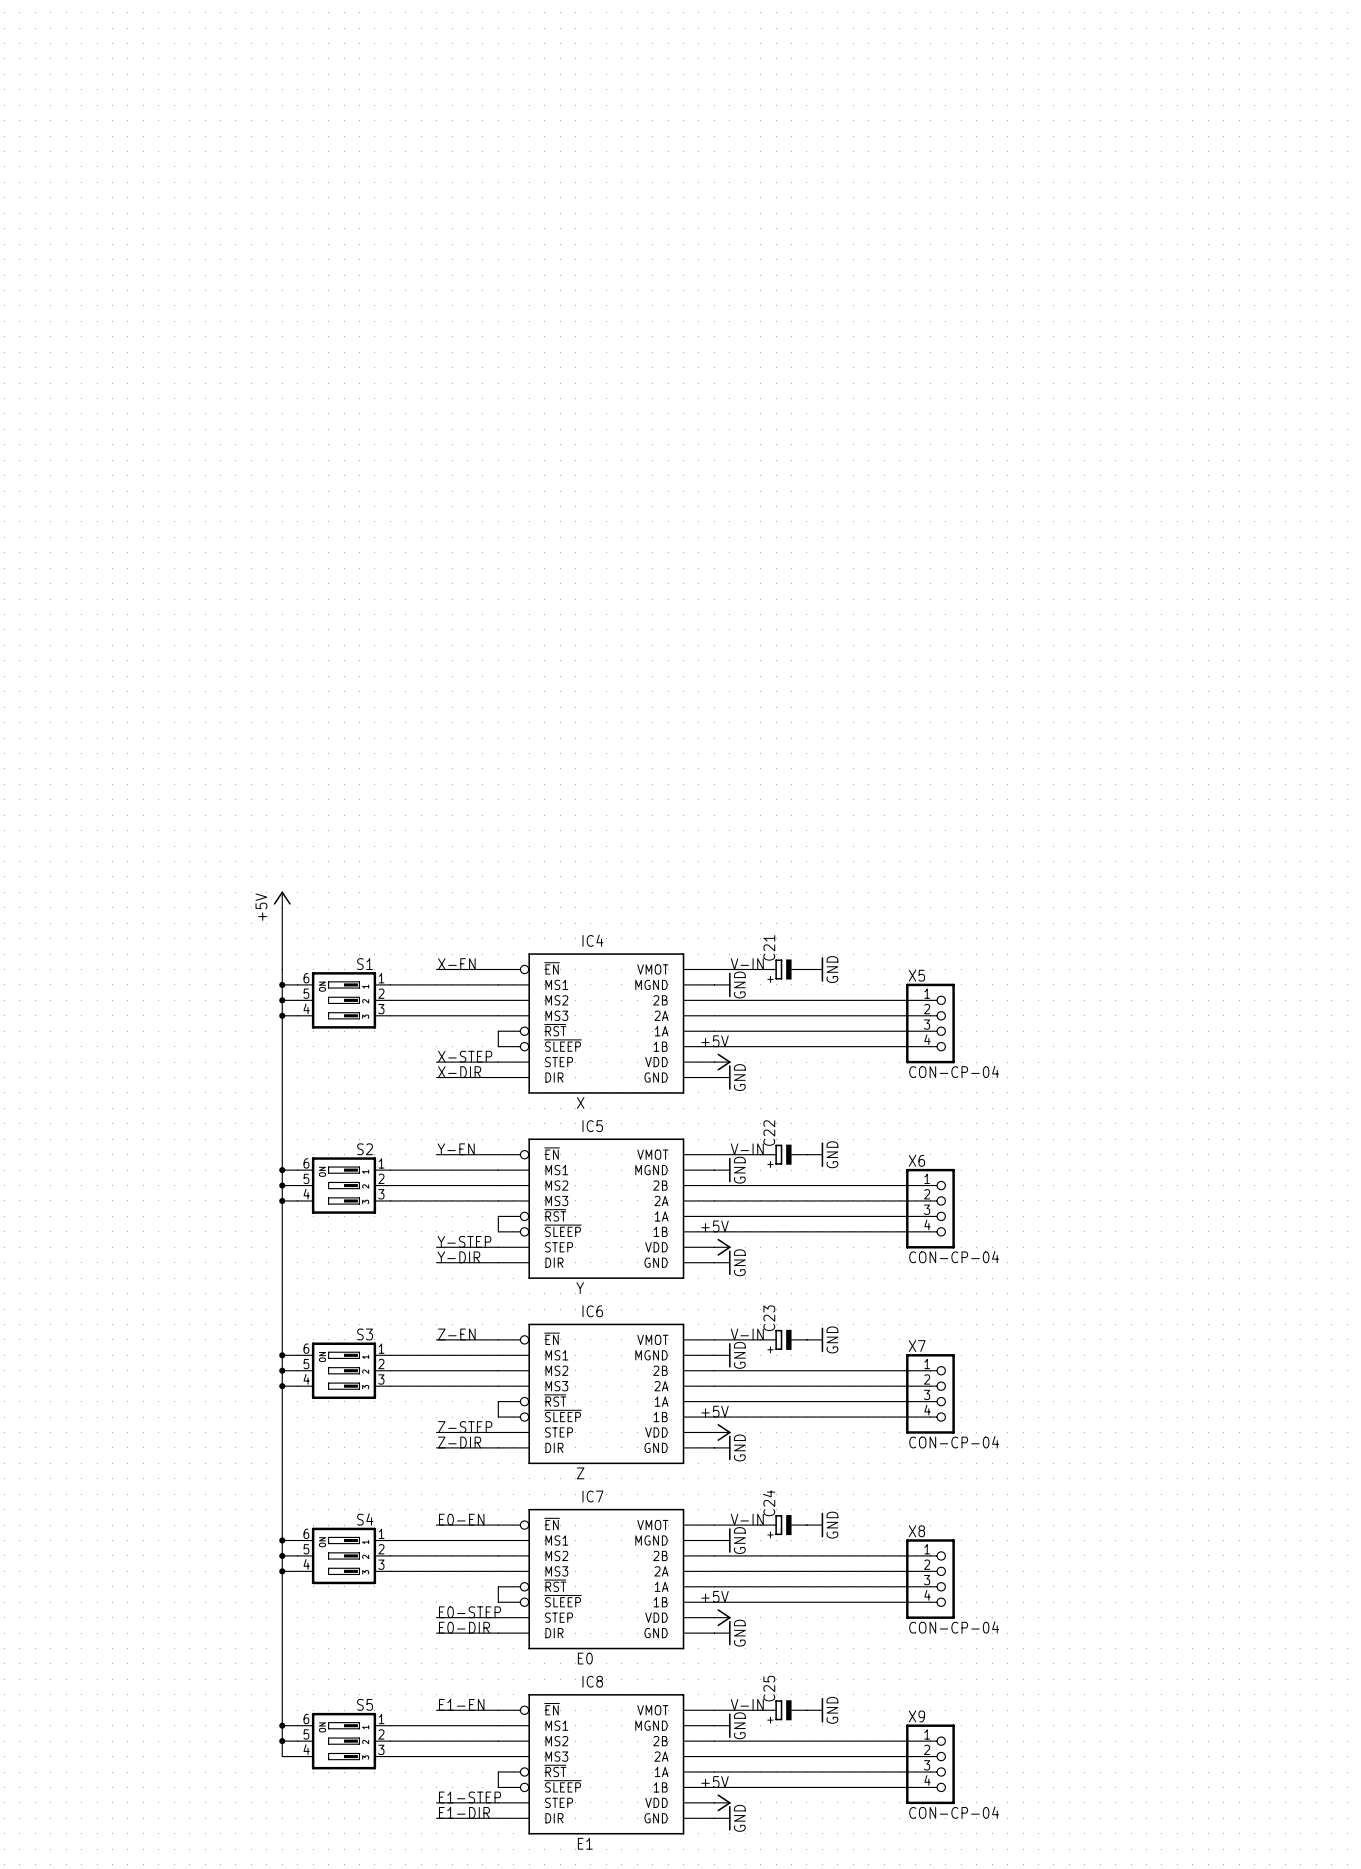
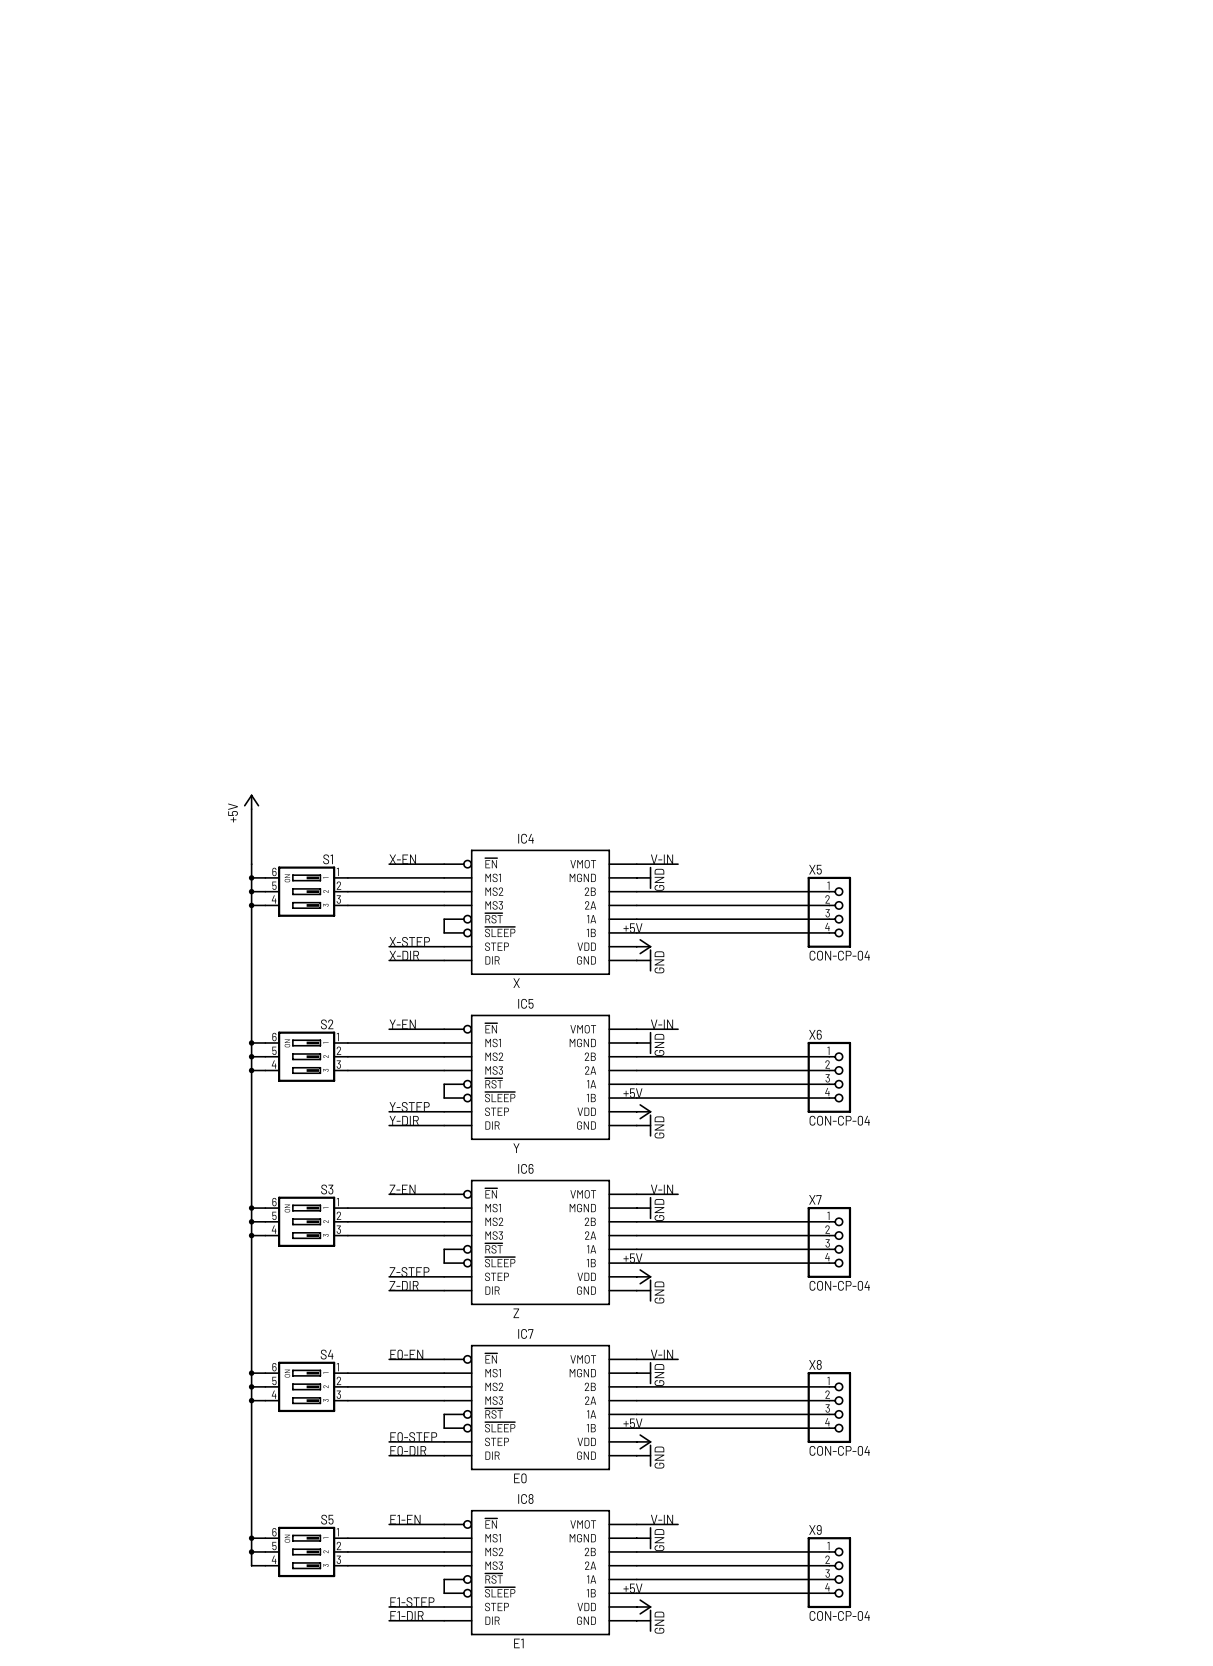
C21: (783, 969) -> none
power symbol: GND (815, 969) -> none
C22: (783, 1154) -> none
power symbol: GND (815, 1154) -> none
C23: (783, 1339) -> none
power symbol: GND (815, 1339) -> none
C24: (783, 1525) -> none
power symbol: GND (815, 1525) -> none
C25: (783, 1710) -> none
power symbol: GND (815, 1710) -> none

